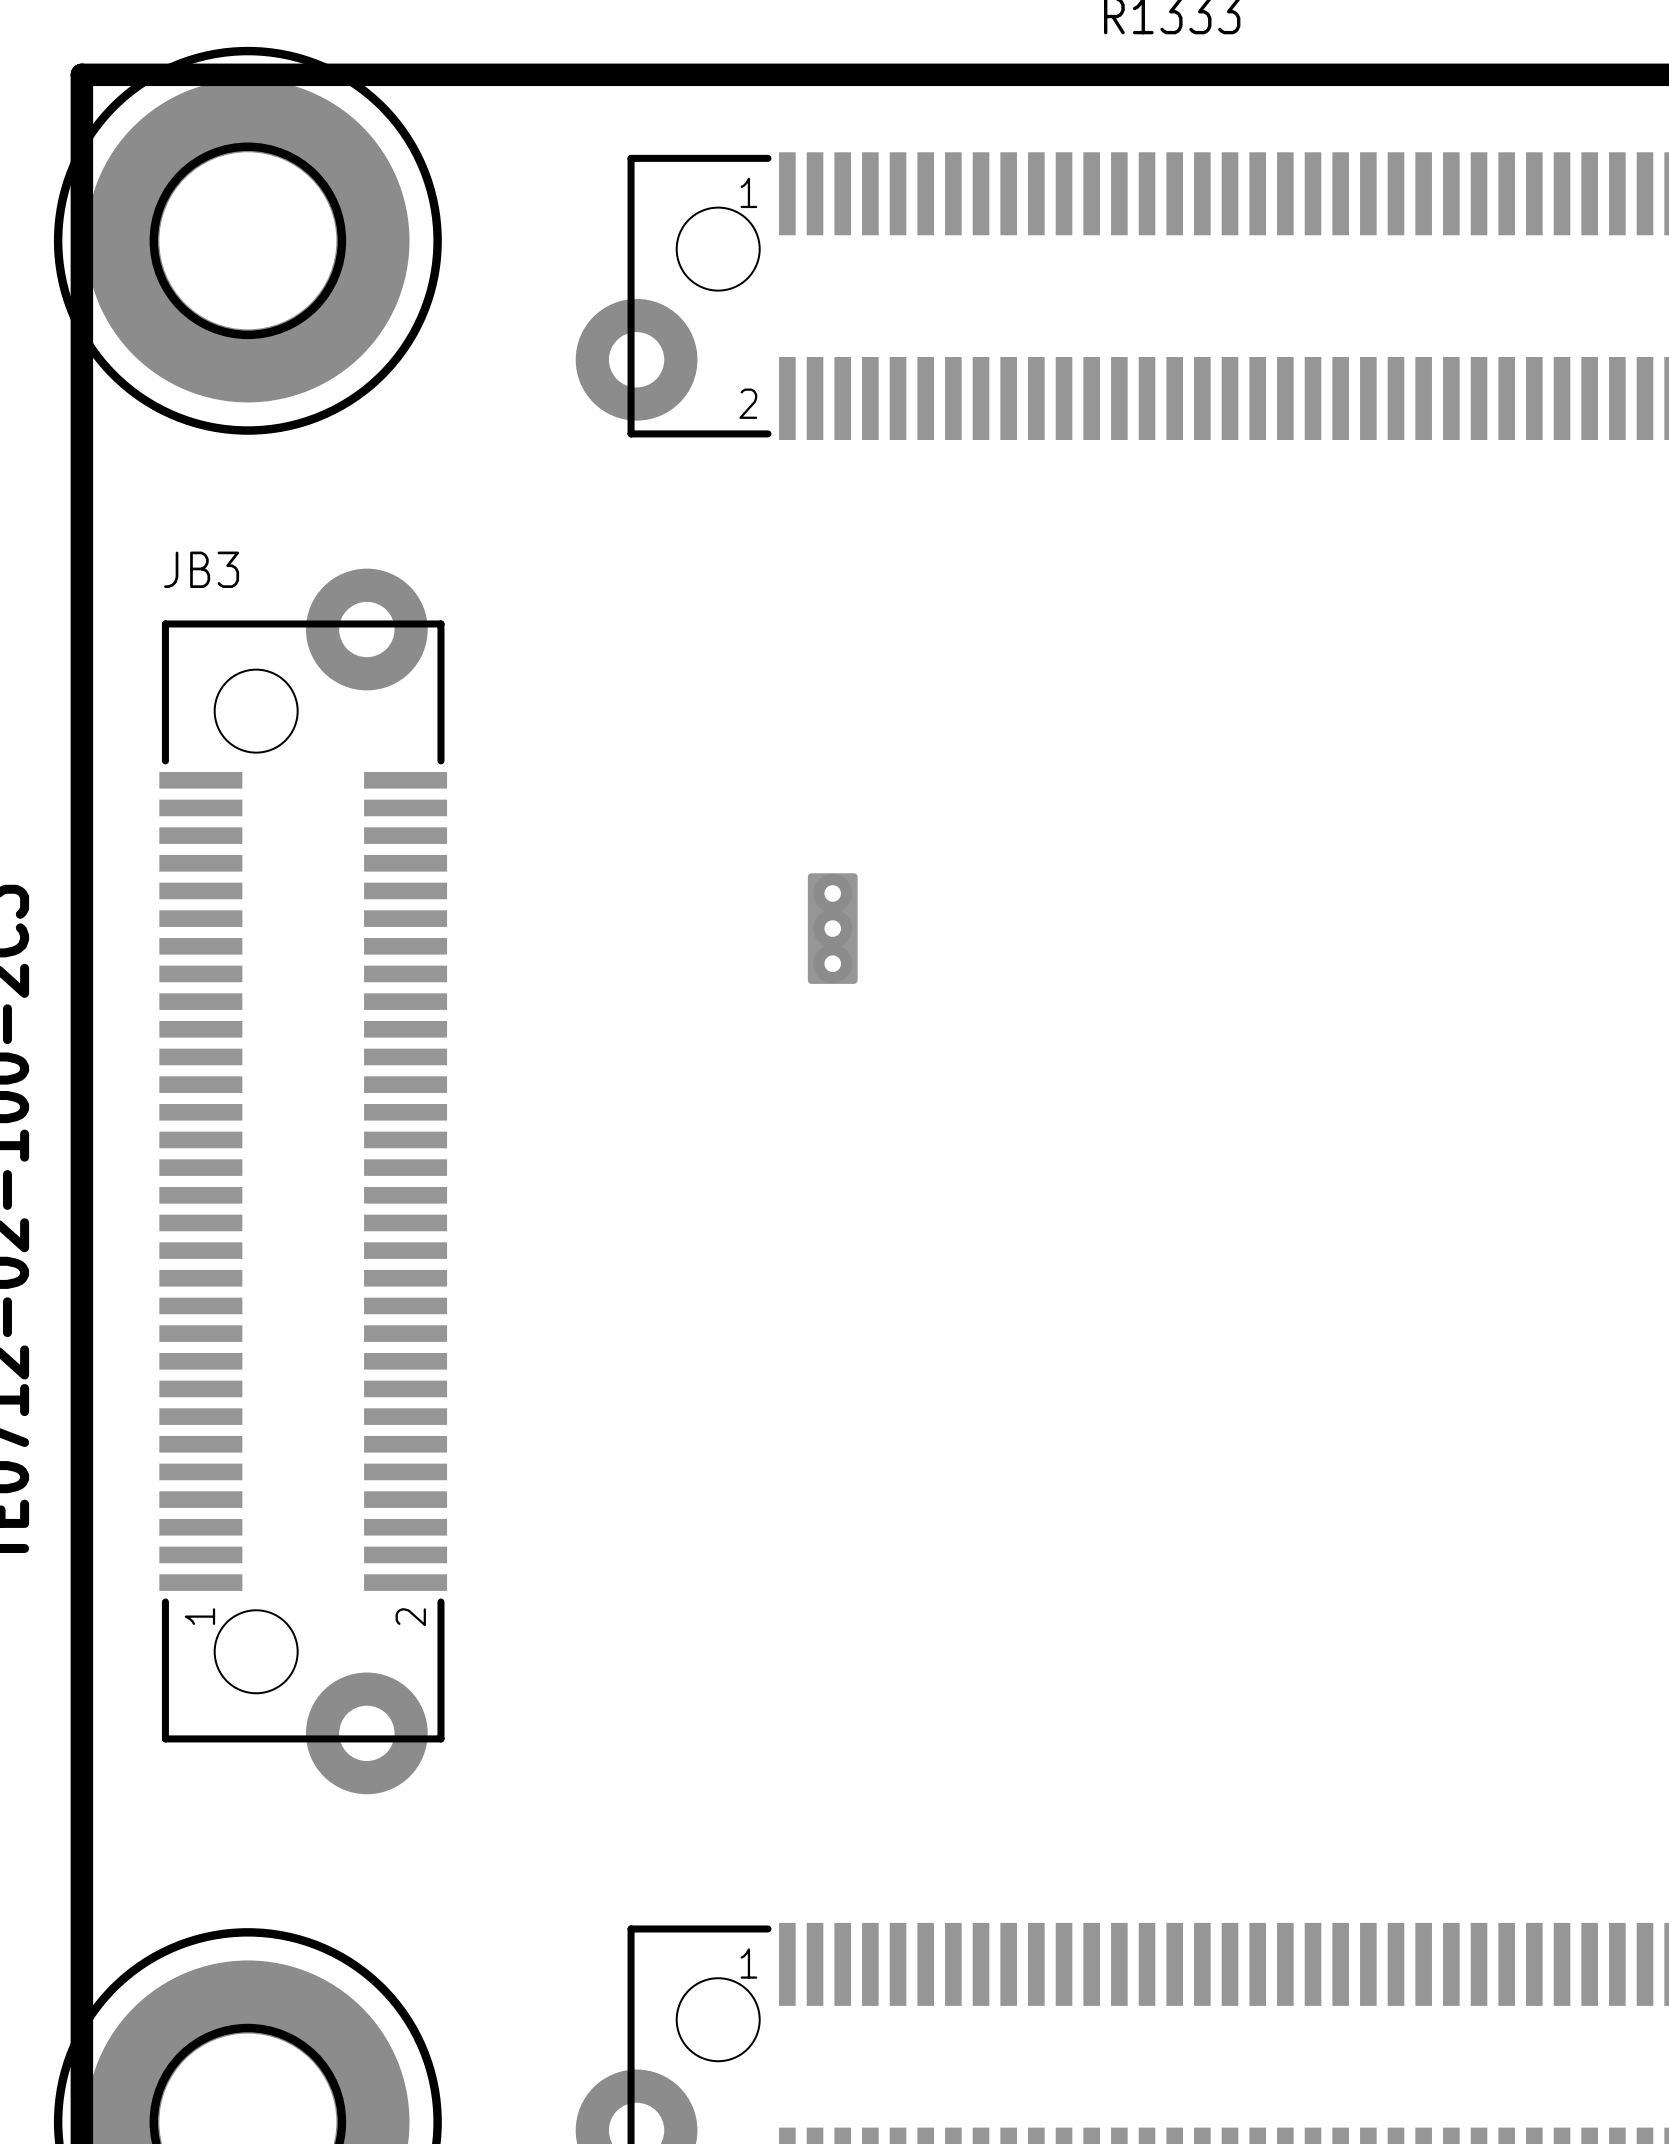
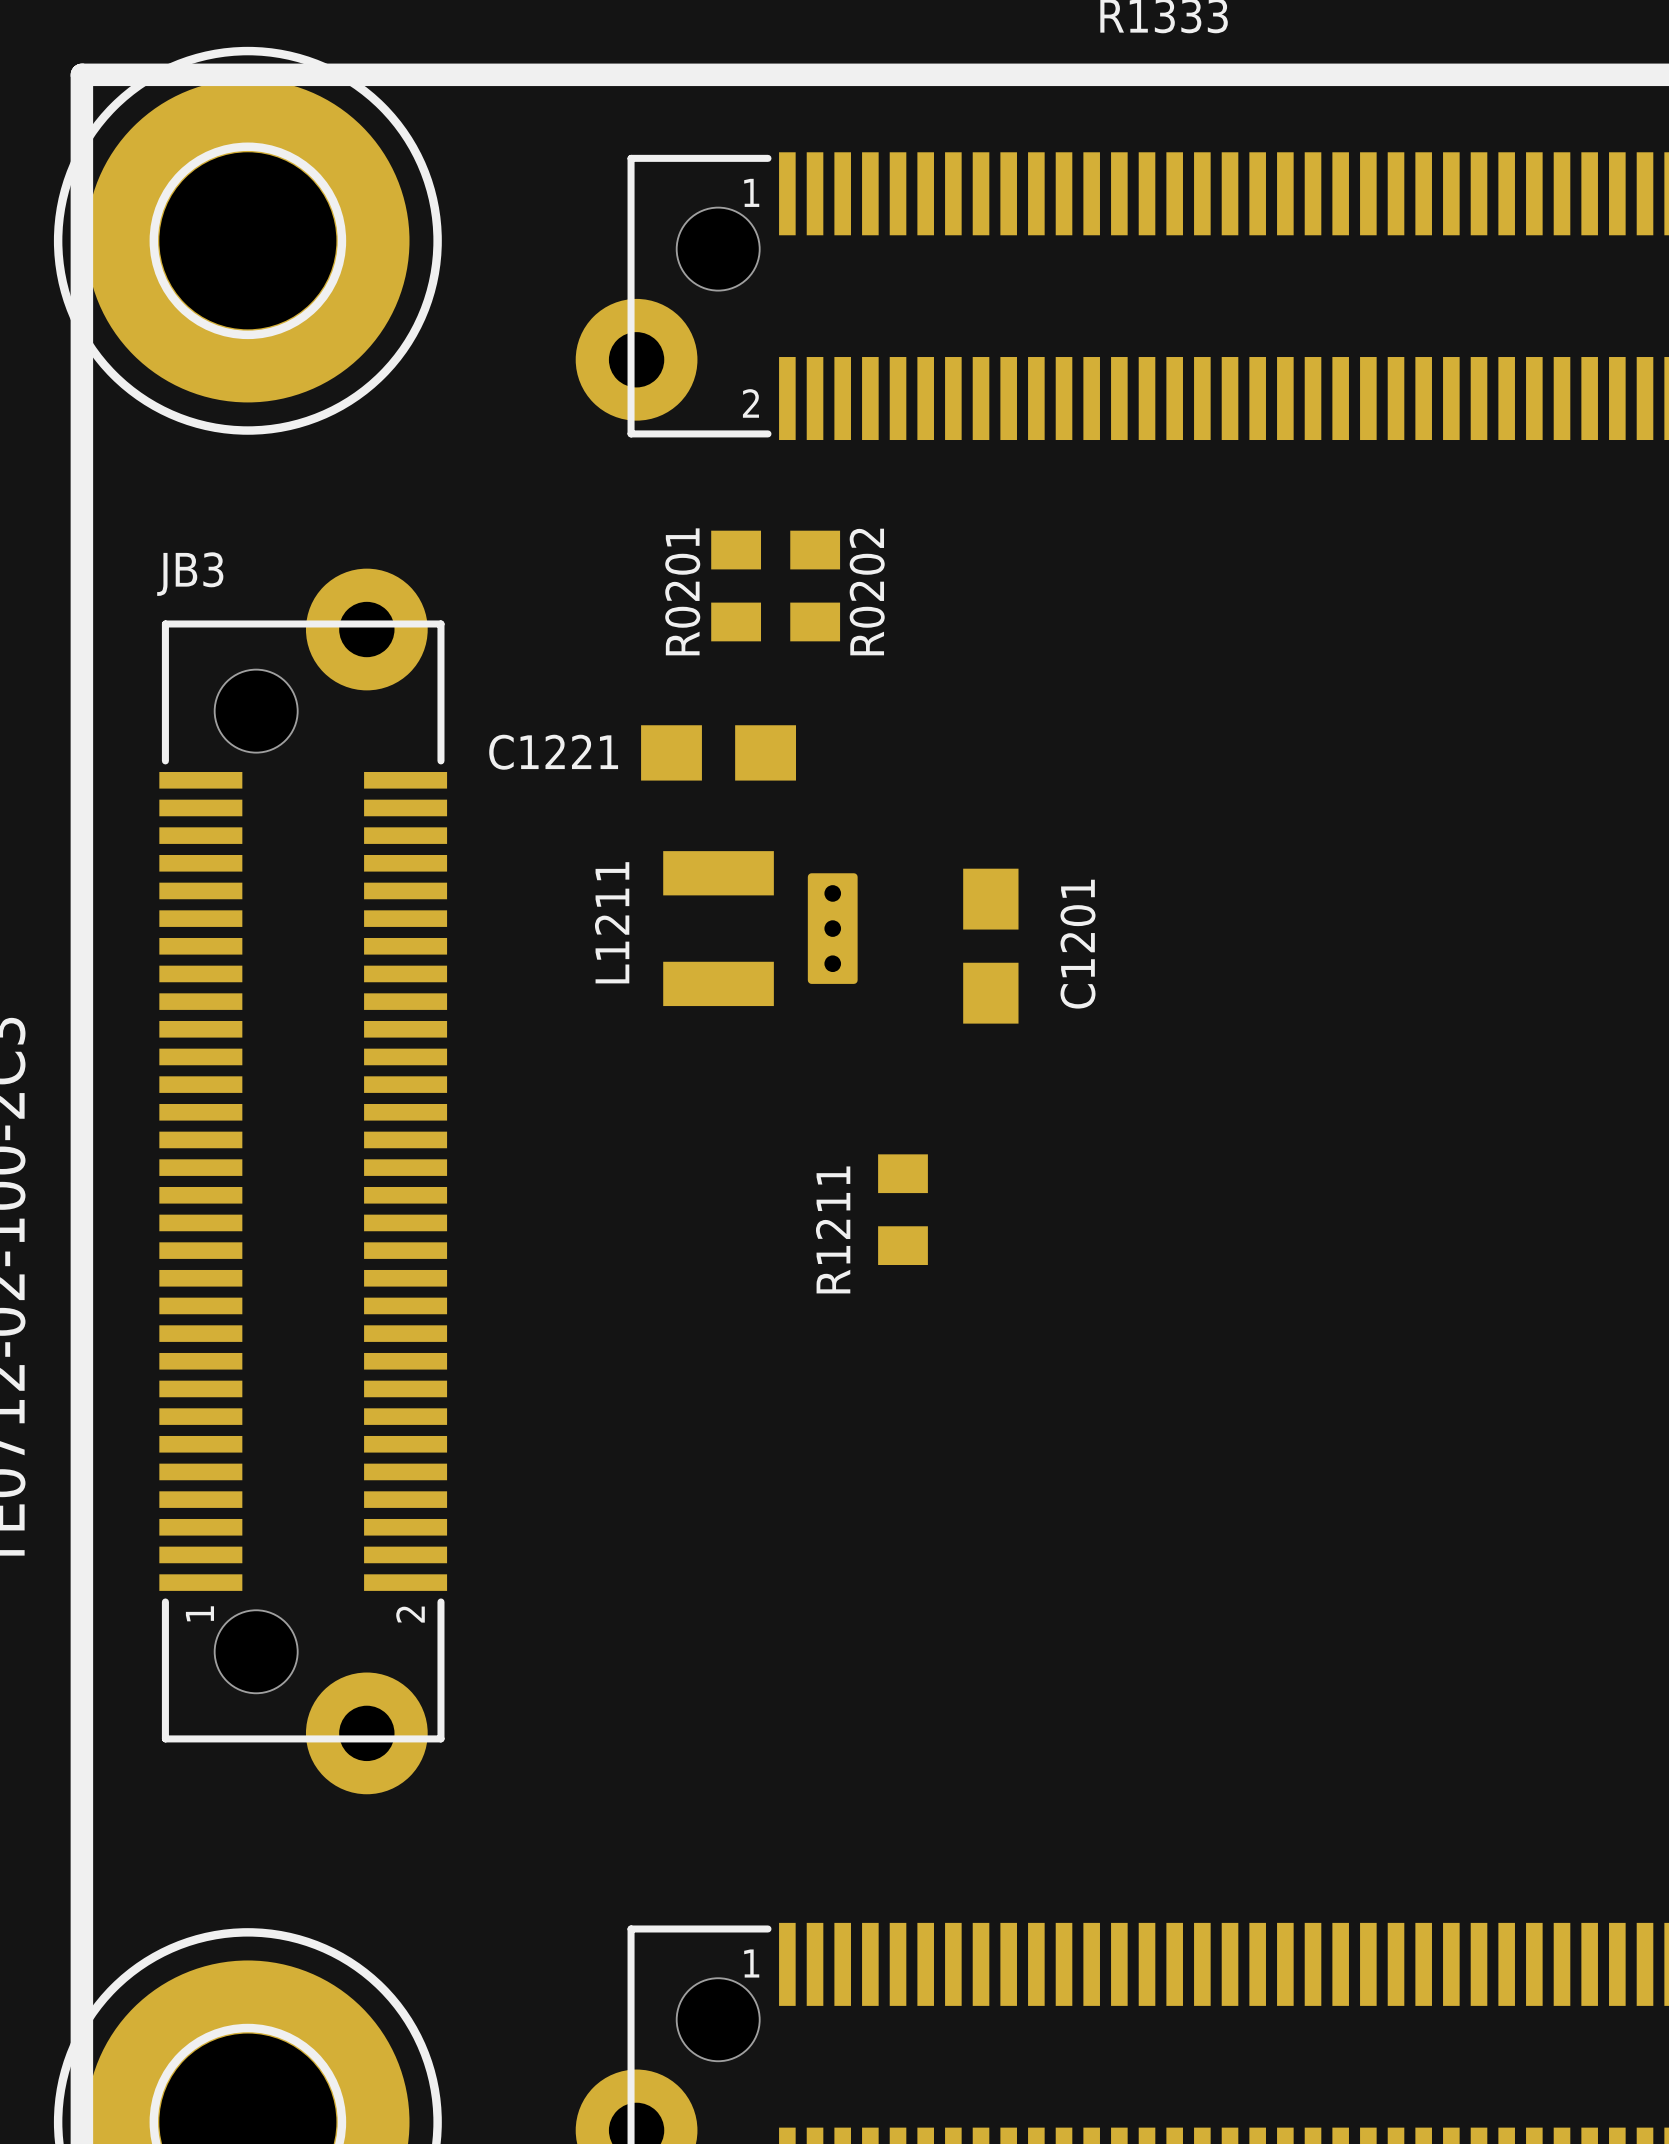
R0201: none -> (736, 586)
R0202: none -> (815, 586)
C1221: none -> (718, 752)
L1211: none -> (718, 928)
C1201: none -> (990, 946)
R1211: none -> (903, 1209)

